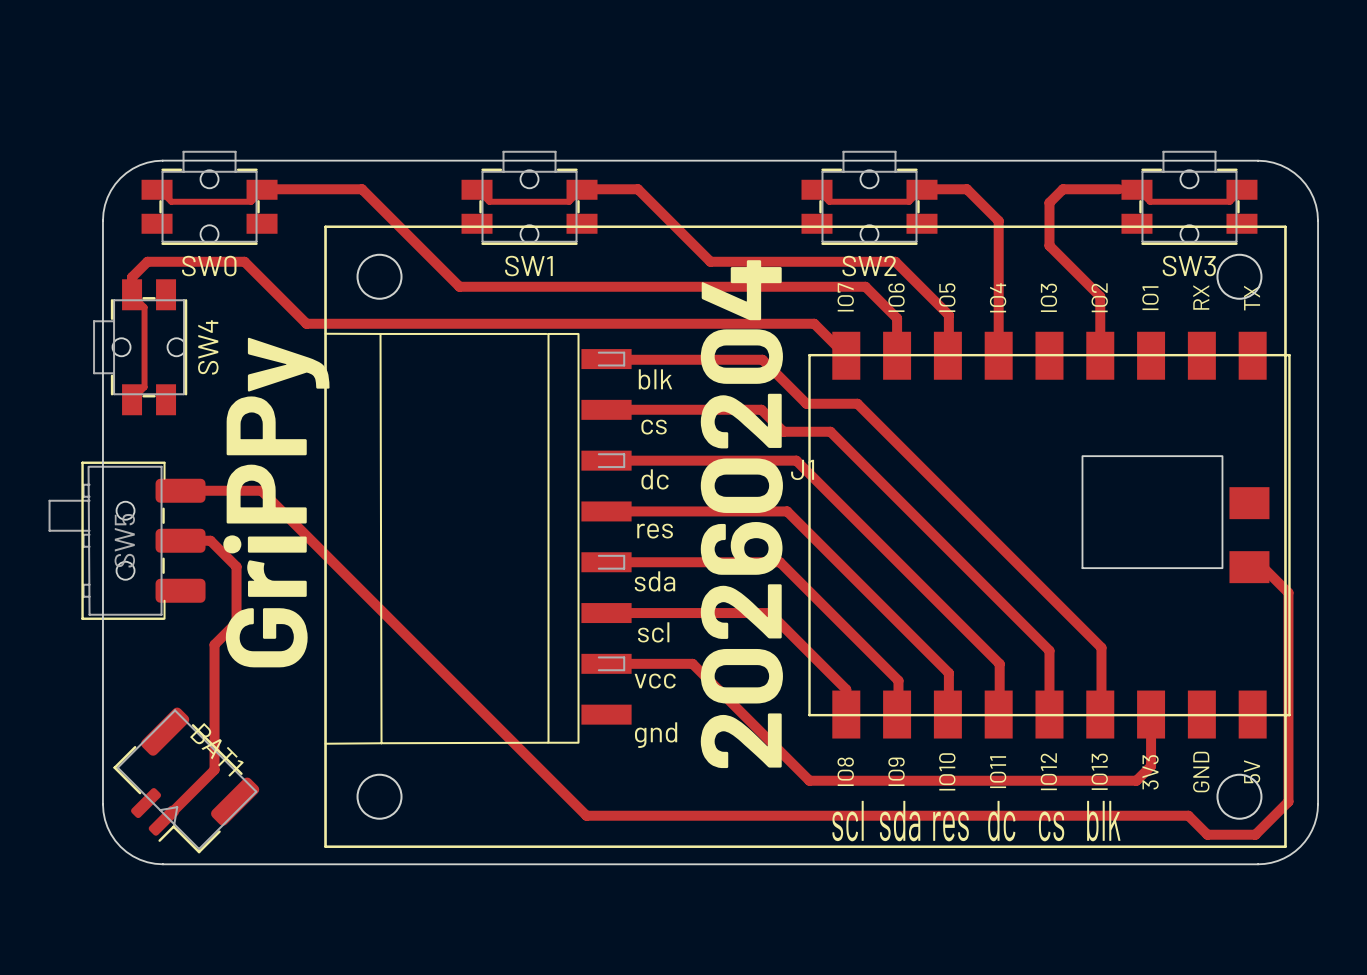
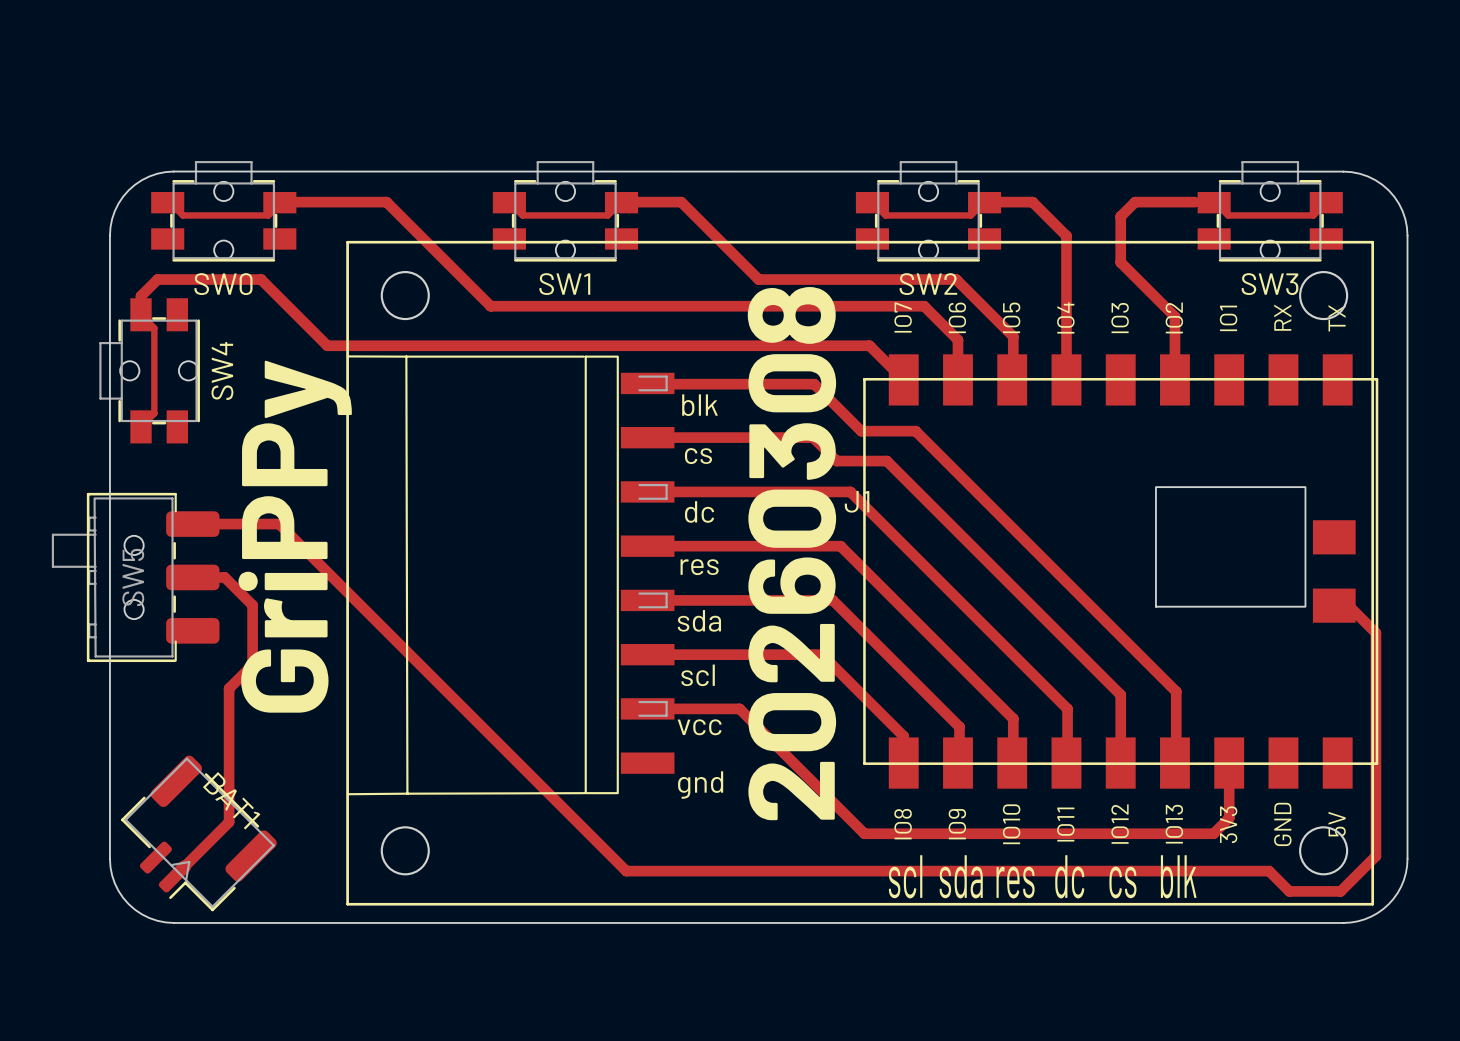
text: 20260204 (741, 514) -> 20260308 (791, 553)

